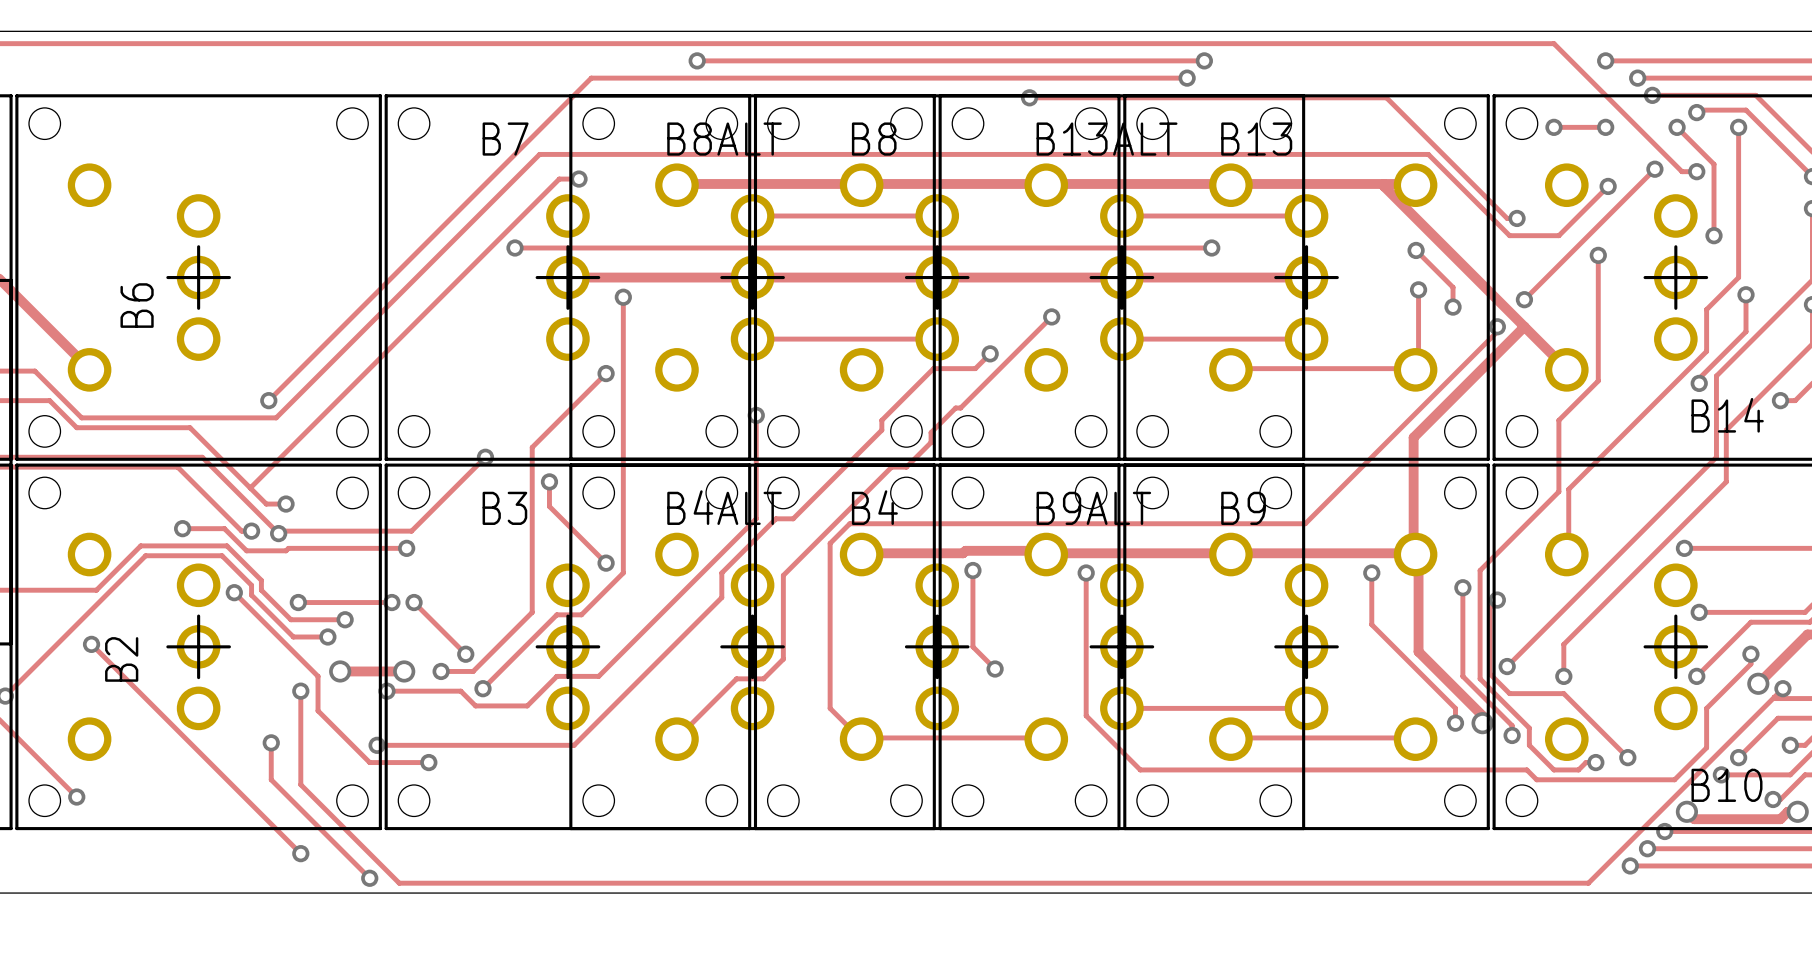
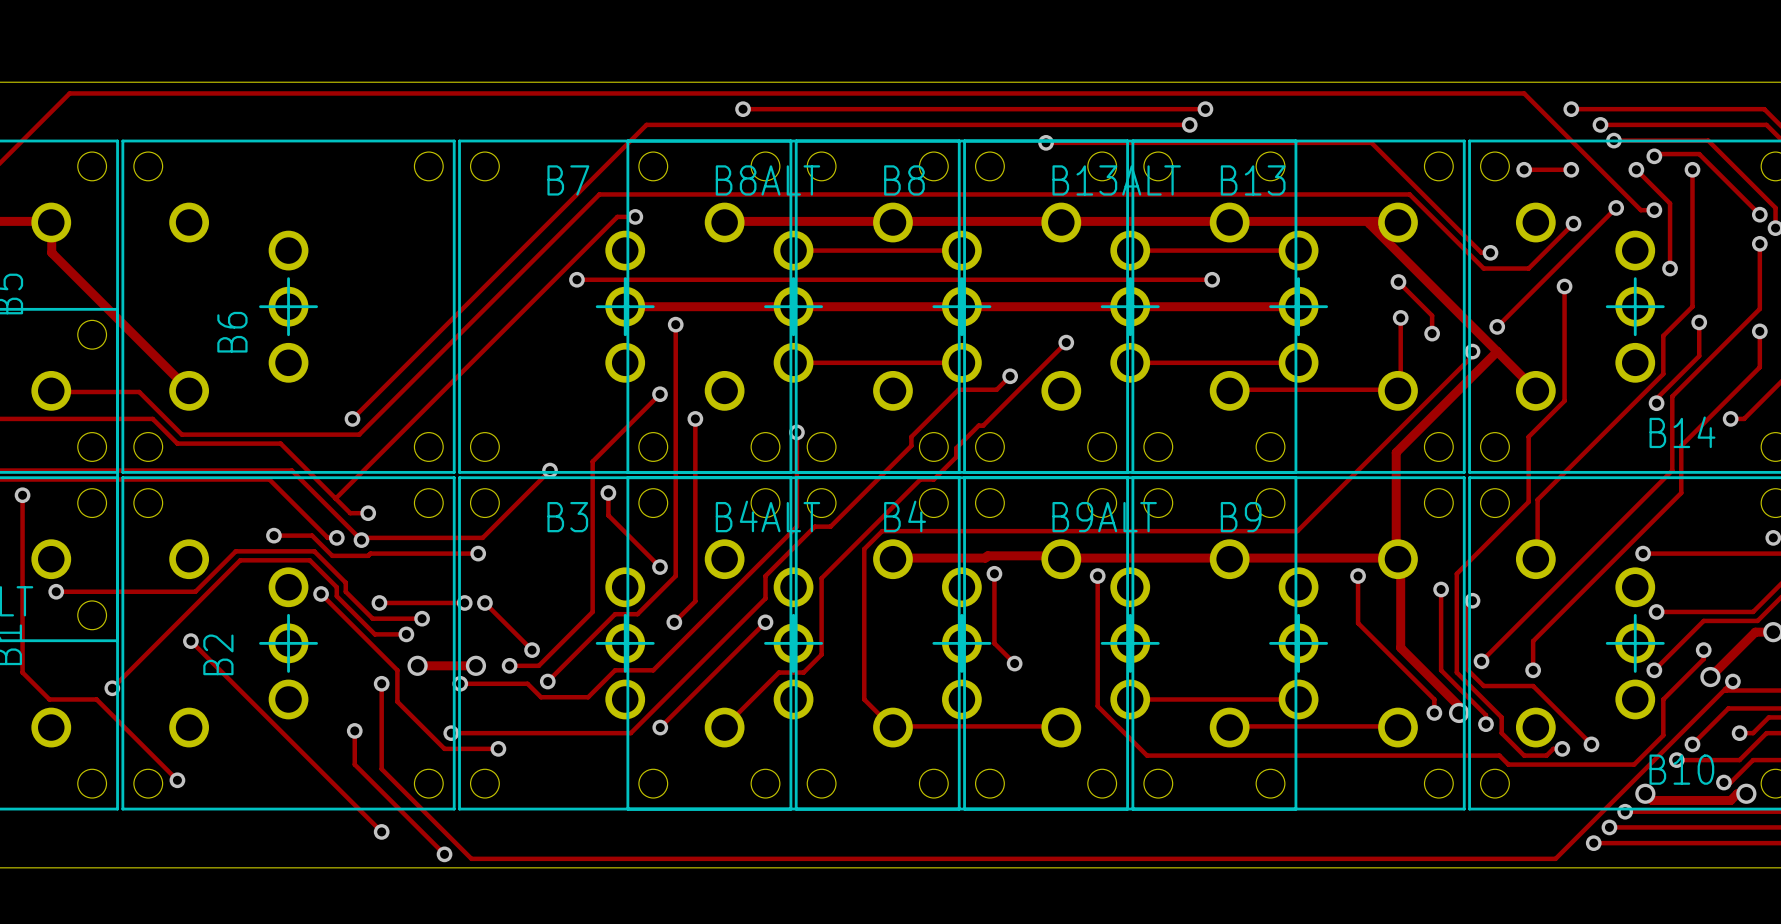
track: none -> (695, 418) (695, 601) (674, 622)
via: none -> (695, 418)
via: none -> (674, 622)
track: none -> (765, 622) (660, 727)
via: none -> (765, 622)
via: none -> (660, 727)

